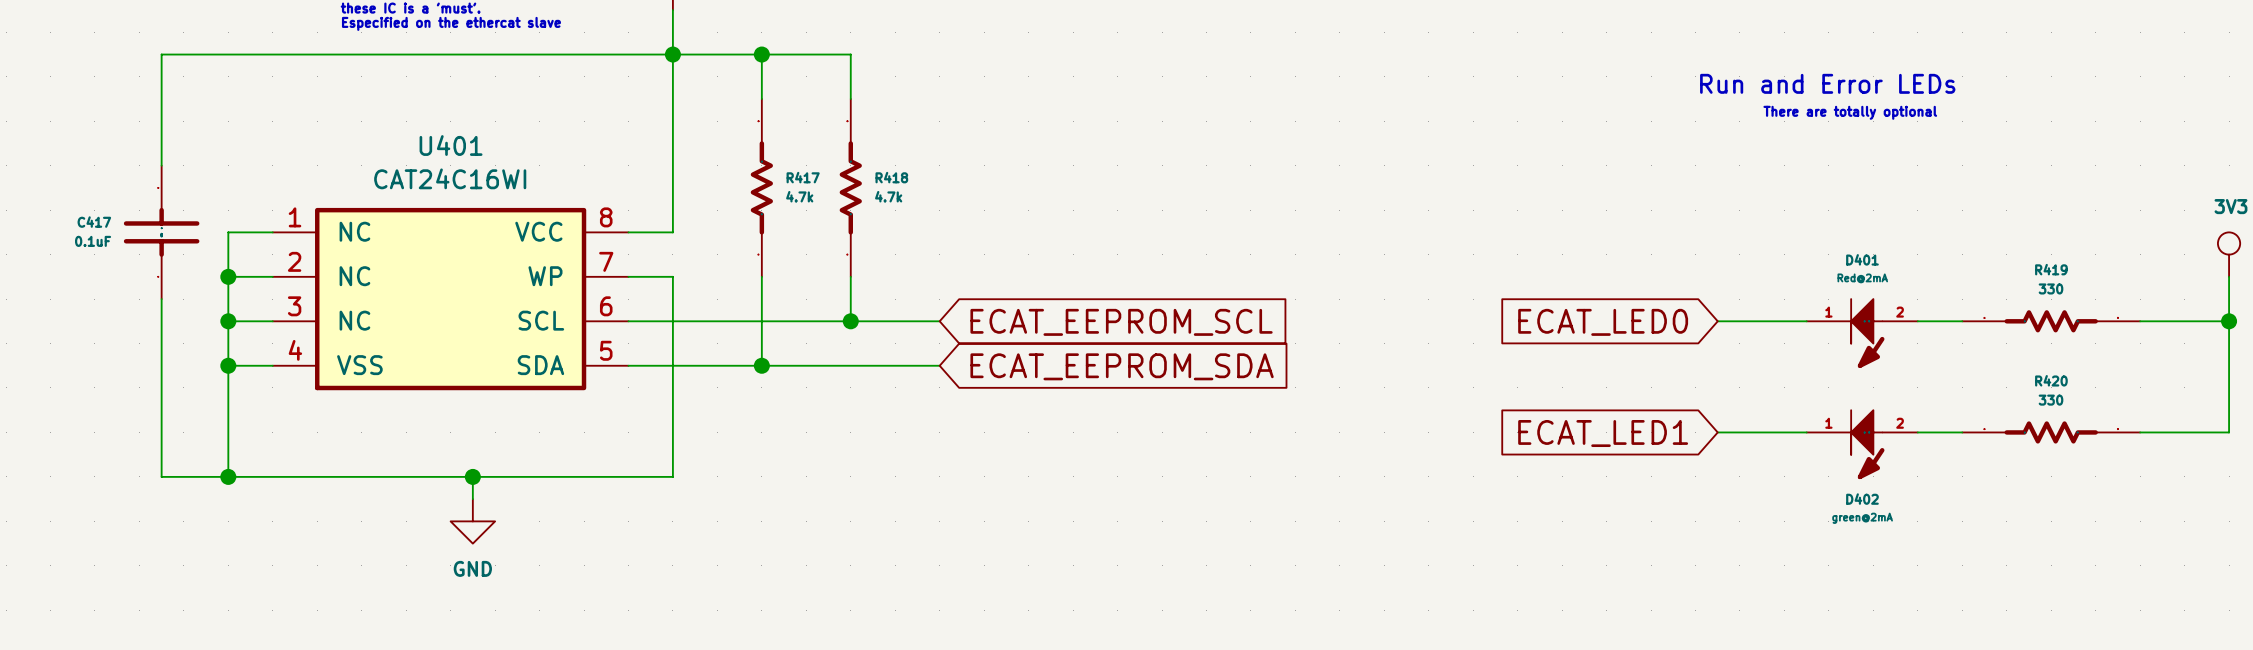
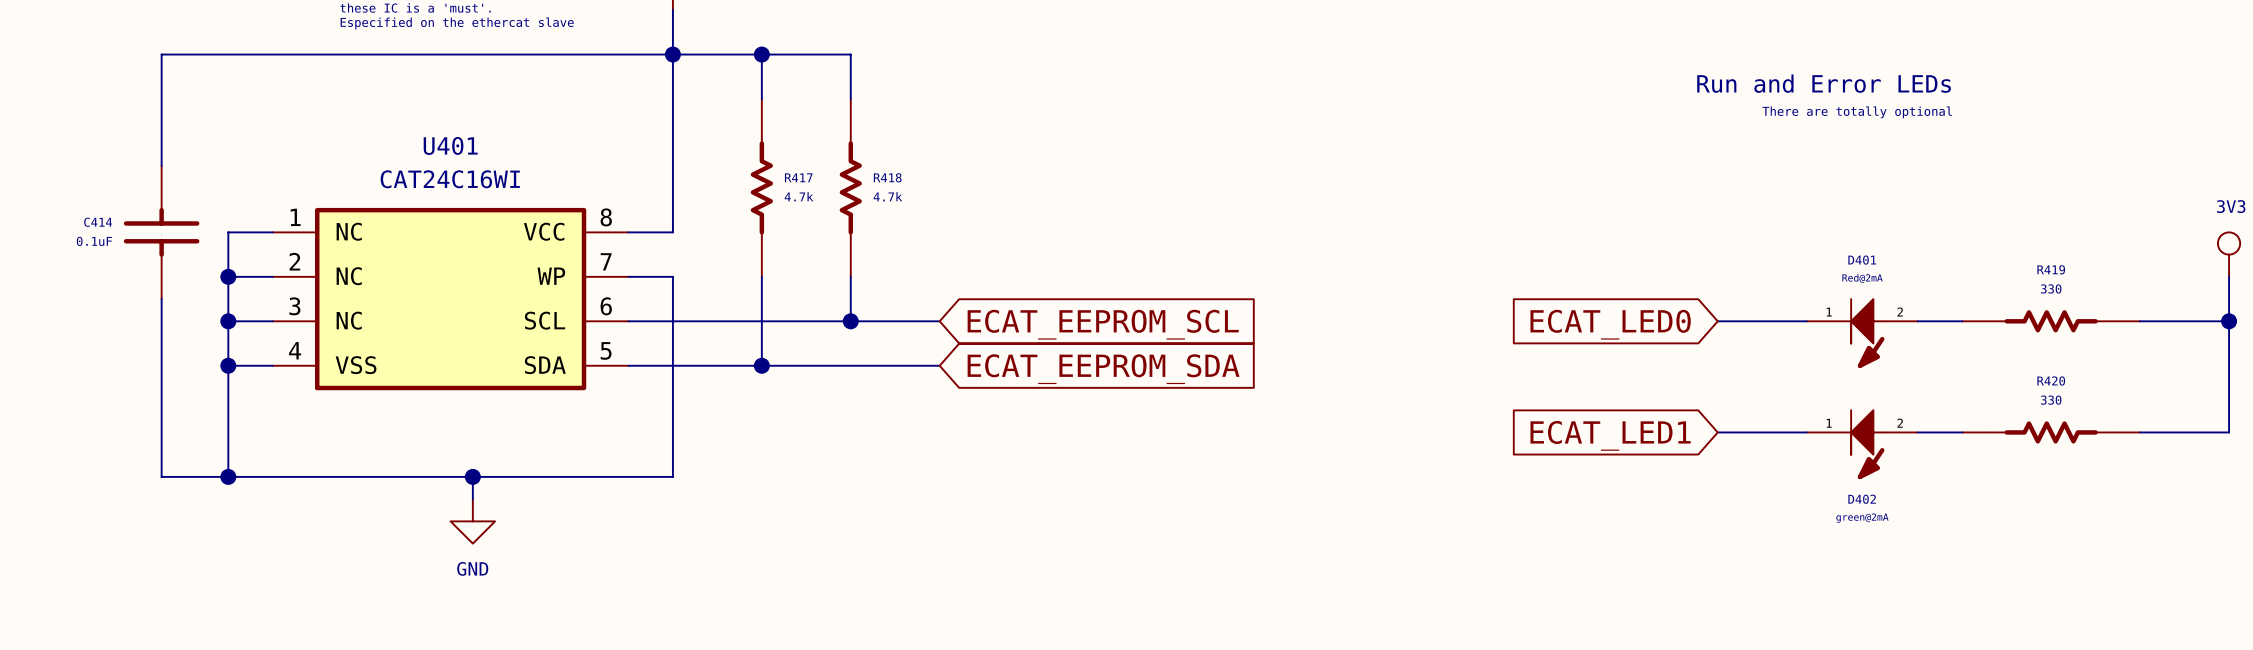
C417 name: C417 (94, 222) -> C414 (98, 222)

